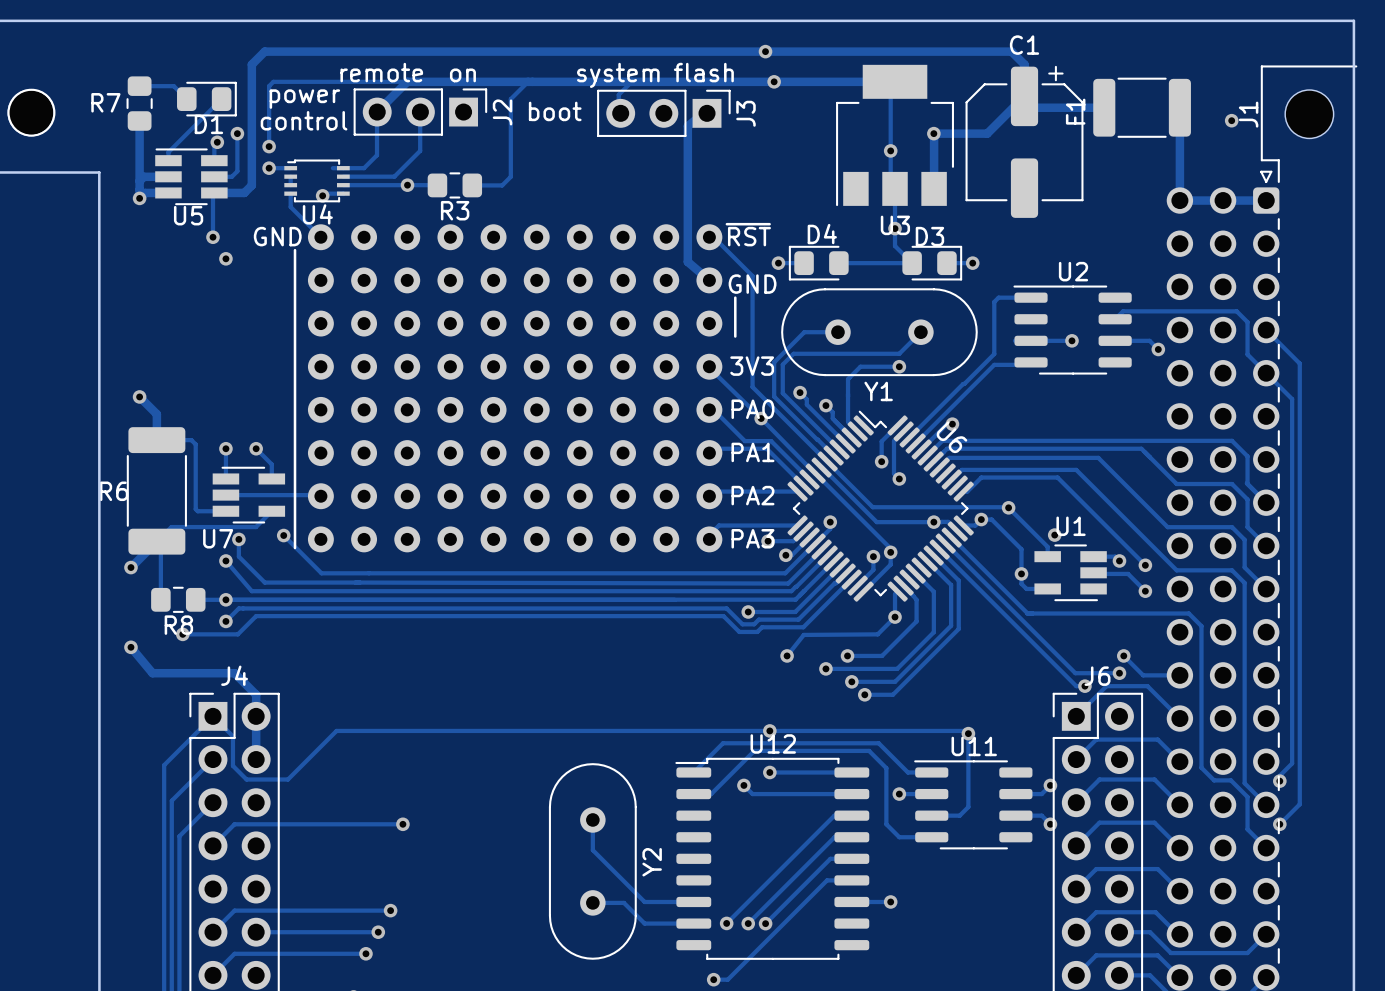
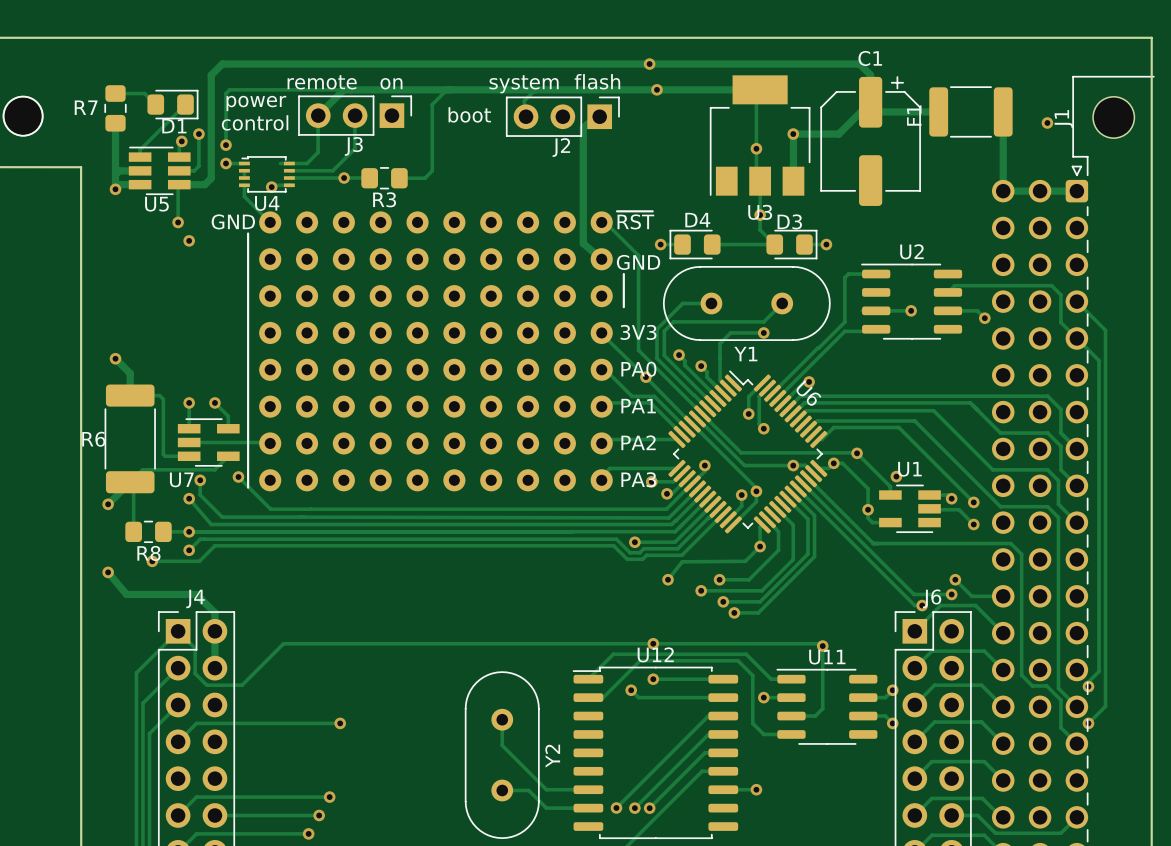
J2 name: J2 (502, 112) -> J3 (353, 146)
J3 name: J3 (745, 113) -> J2 (561, 147)

